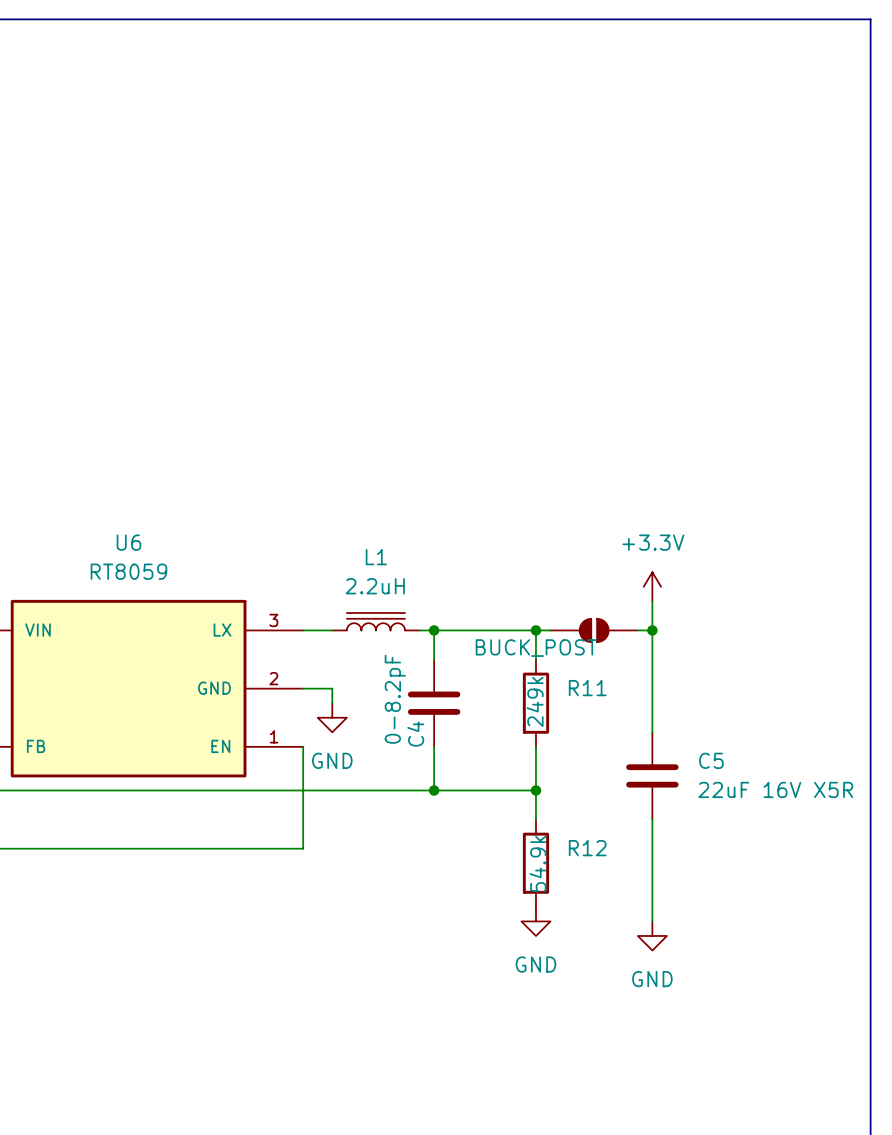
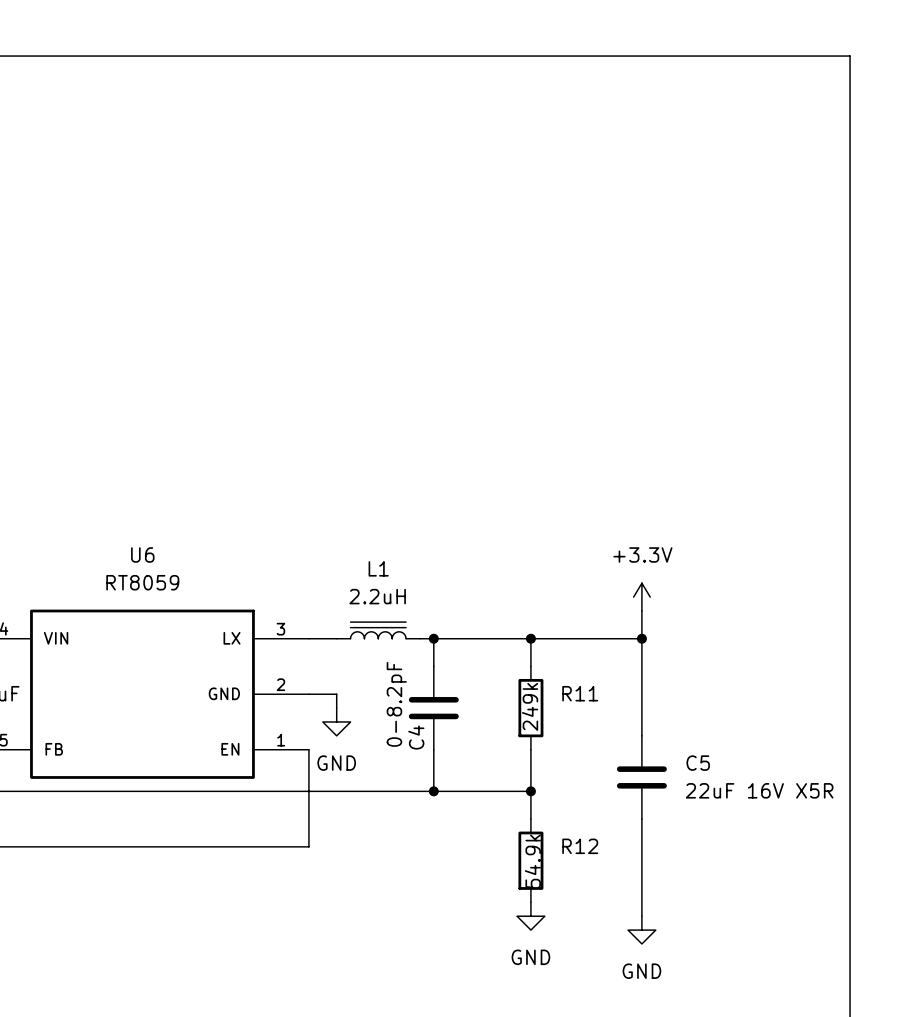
BUCK_POST: (594, 630) -> none

